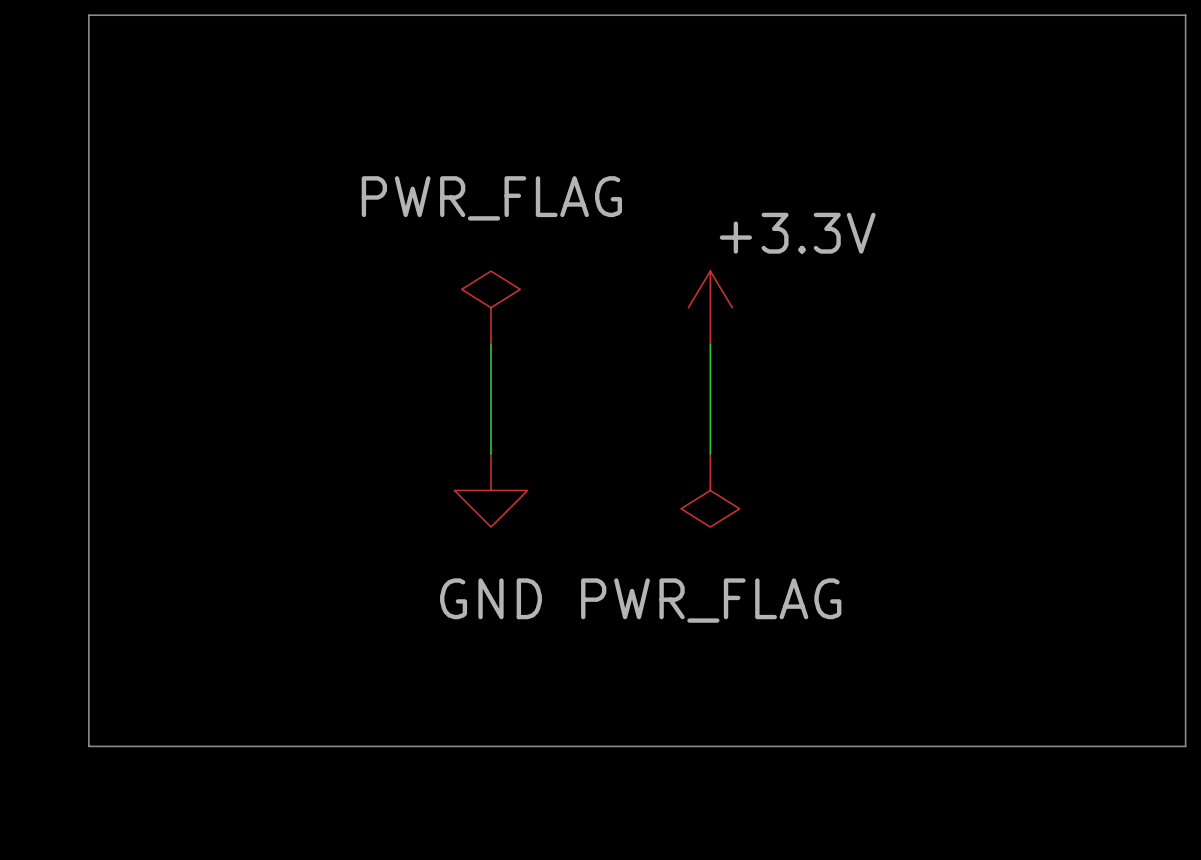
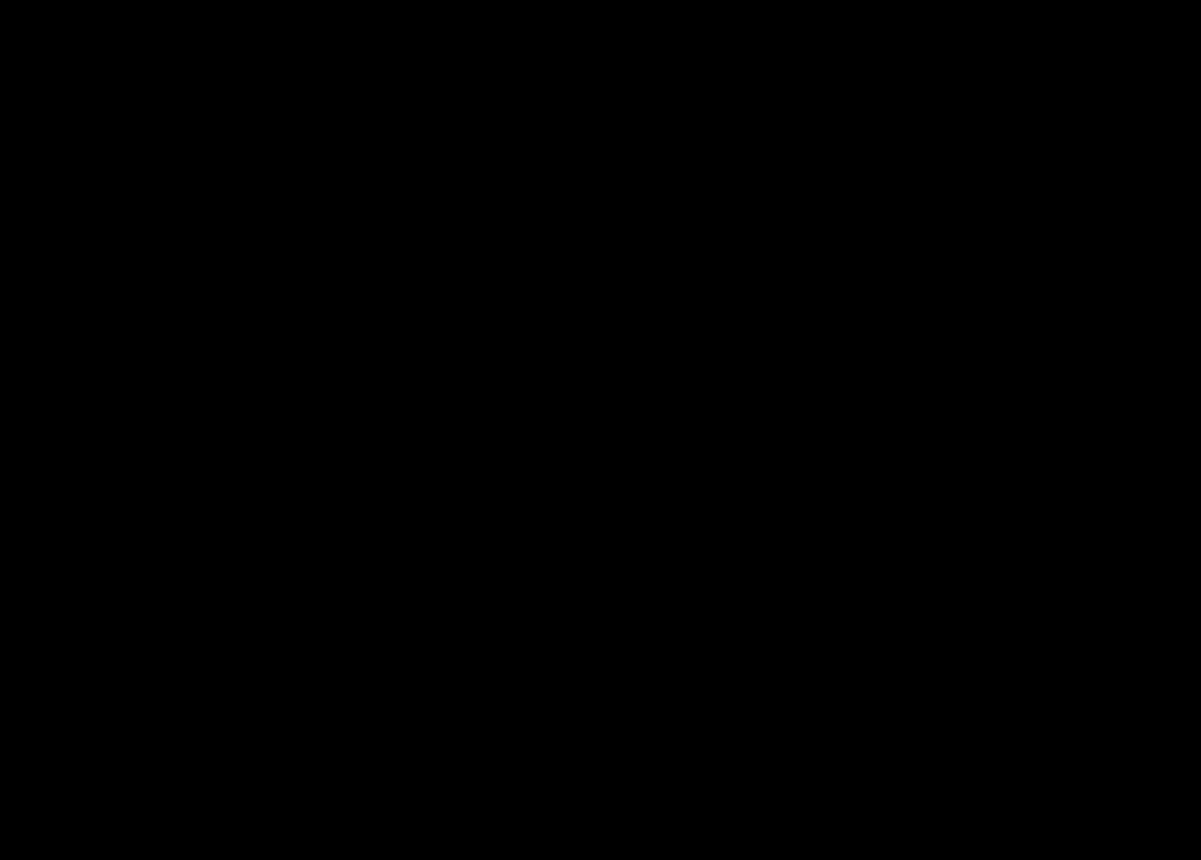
line: (88, 15) (1185, 15) (1185, 746) (88, 746) (88, 15) -> none
power symbol: PWR_FLAG (491, 307) -> none
power symbol: +3.3V (710, 307) -> none
wire: (491, 344) (491, 453) -> none
wire: (710, 344) (710, 453) -> none
power symbol: GND (491, 490) -> none
power symbol: PWR_FLAG (710, 490) -> none

